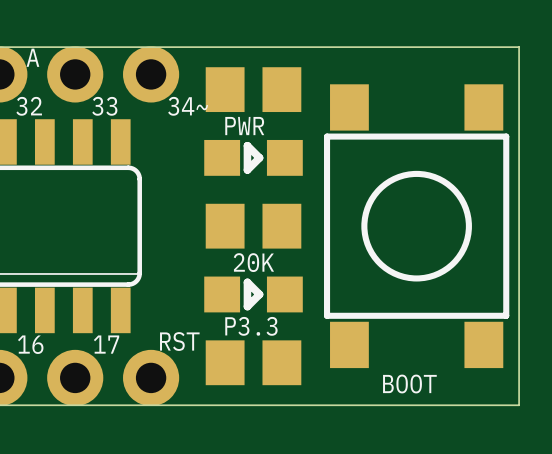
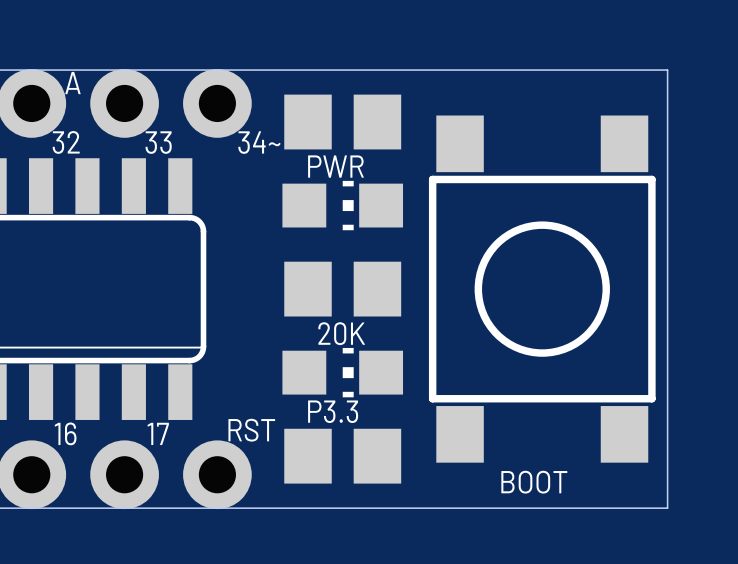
part footprint: [204, 139, 303, 176] -> [282, 180, 404, 231]
part footprint: [204, 276, 303, 313] -> [282, 347, 404, 398]

